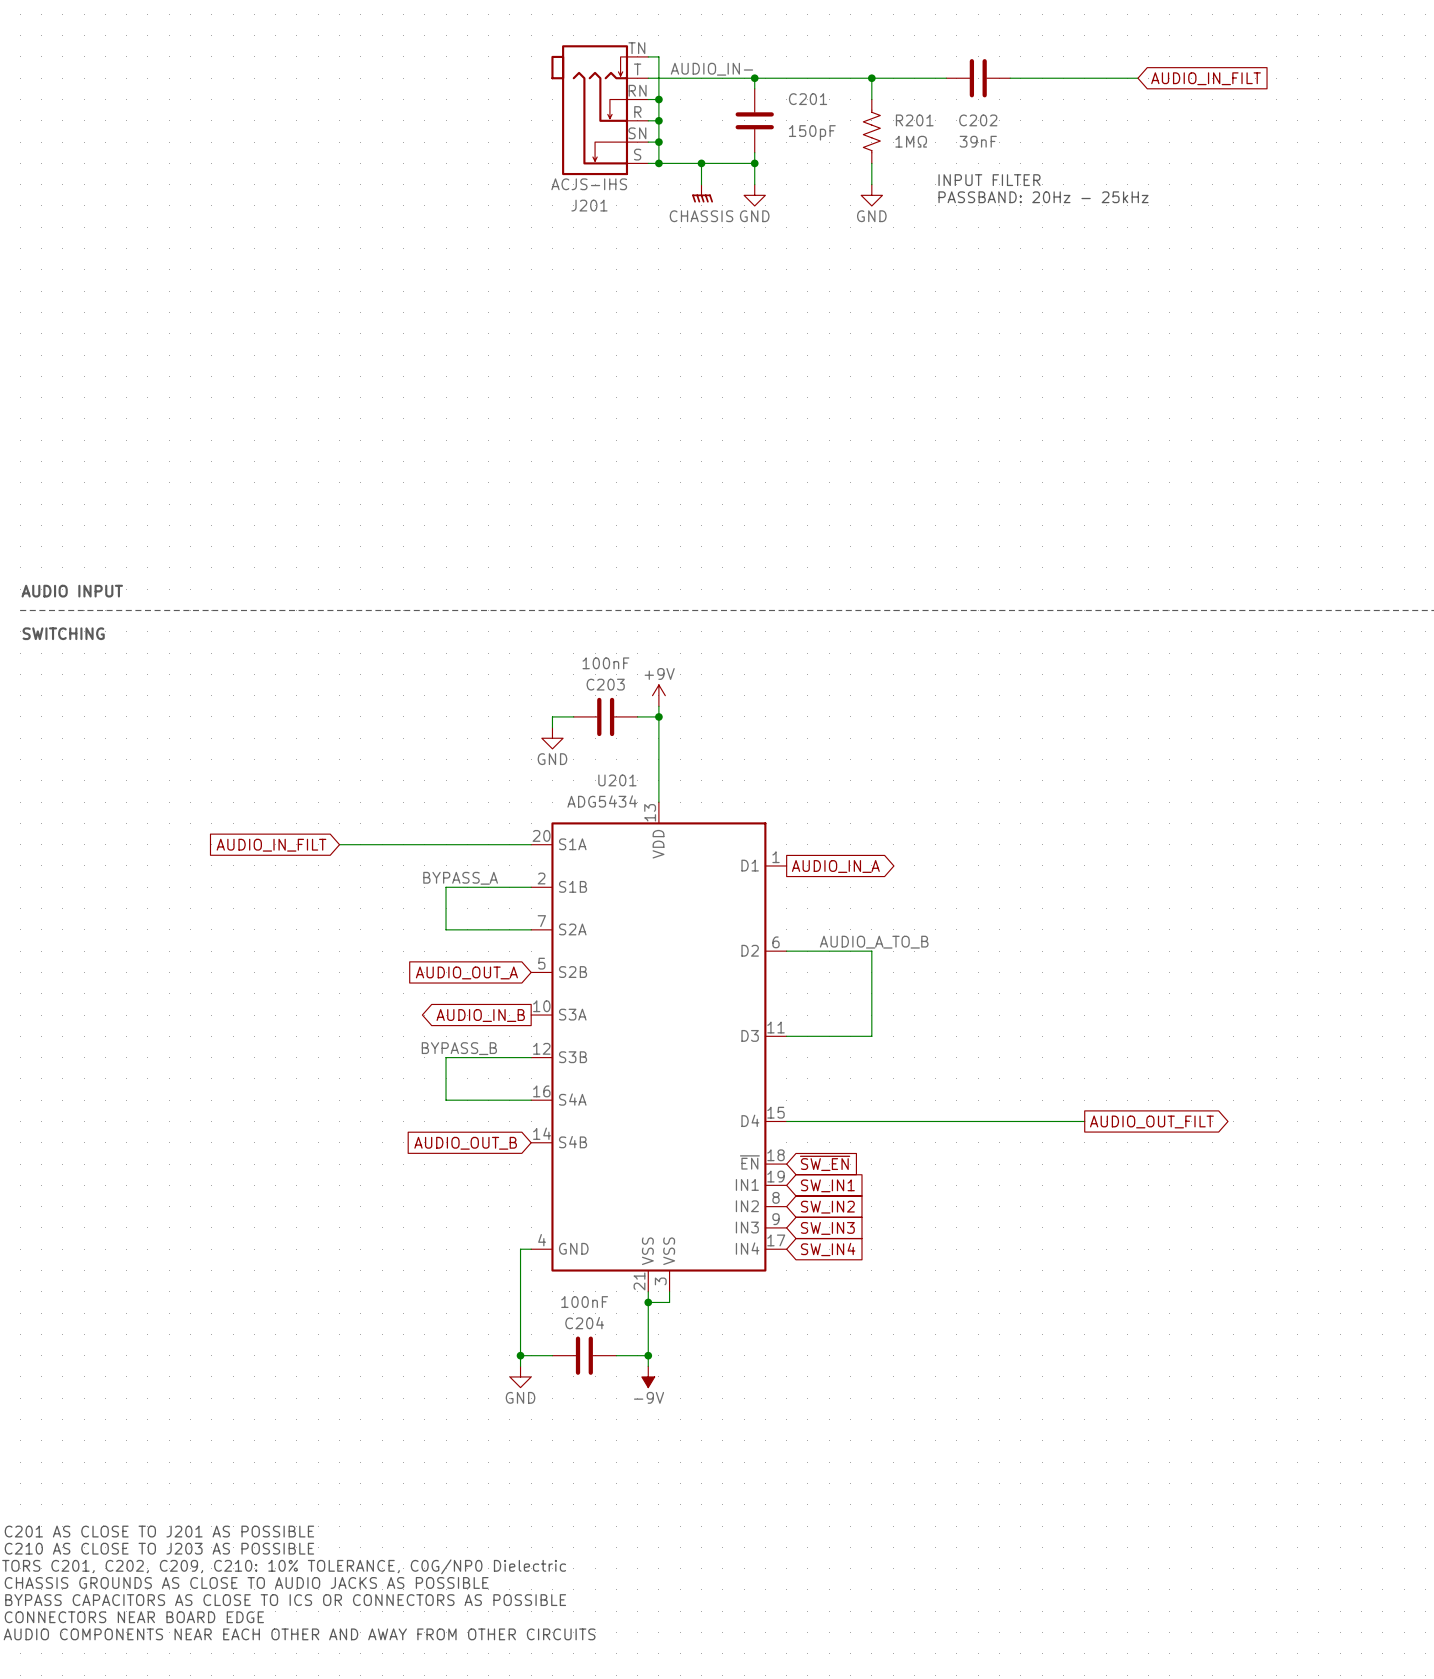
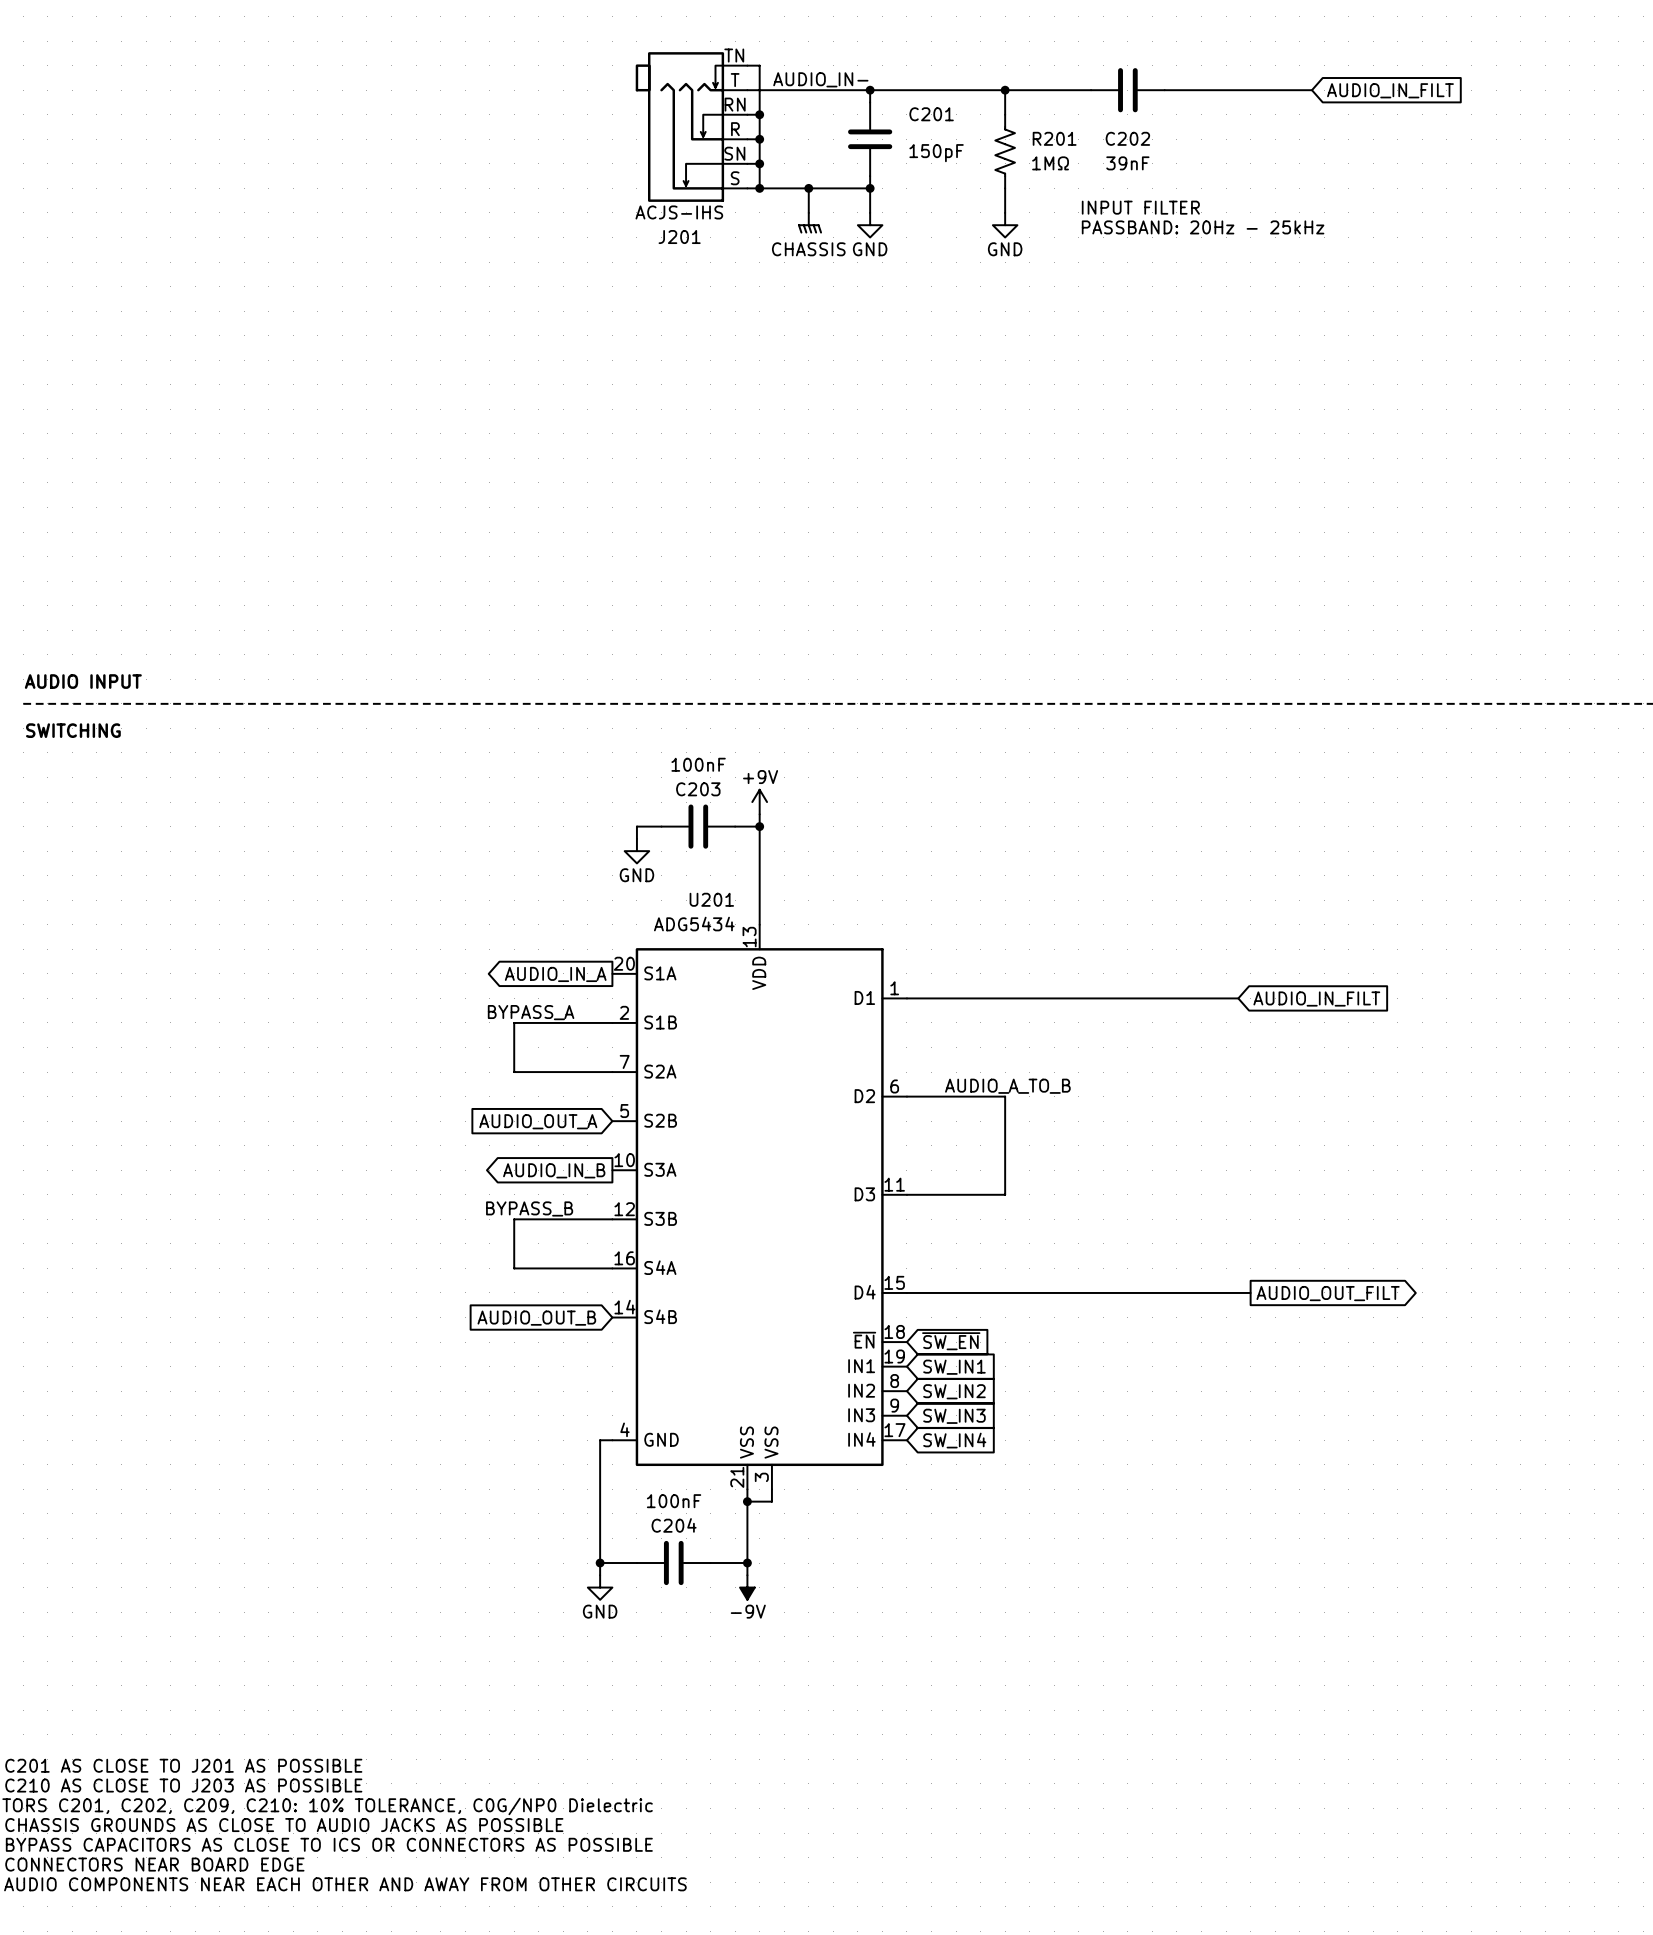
wire: (339, 844) (531, 844) -> none
global label: AUDIO_IN_FILT (271, 845) -> none
global label: none -> AUDIO_IN_A (555, 974)
wire: none -> (906, 998) (1238, 998)
global label: AUDIO_IN_A (835, 866) -> none
global label: none -> AUDIO_IN_FILT (1316, 999)

